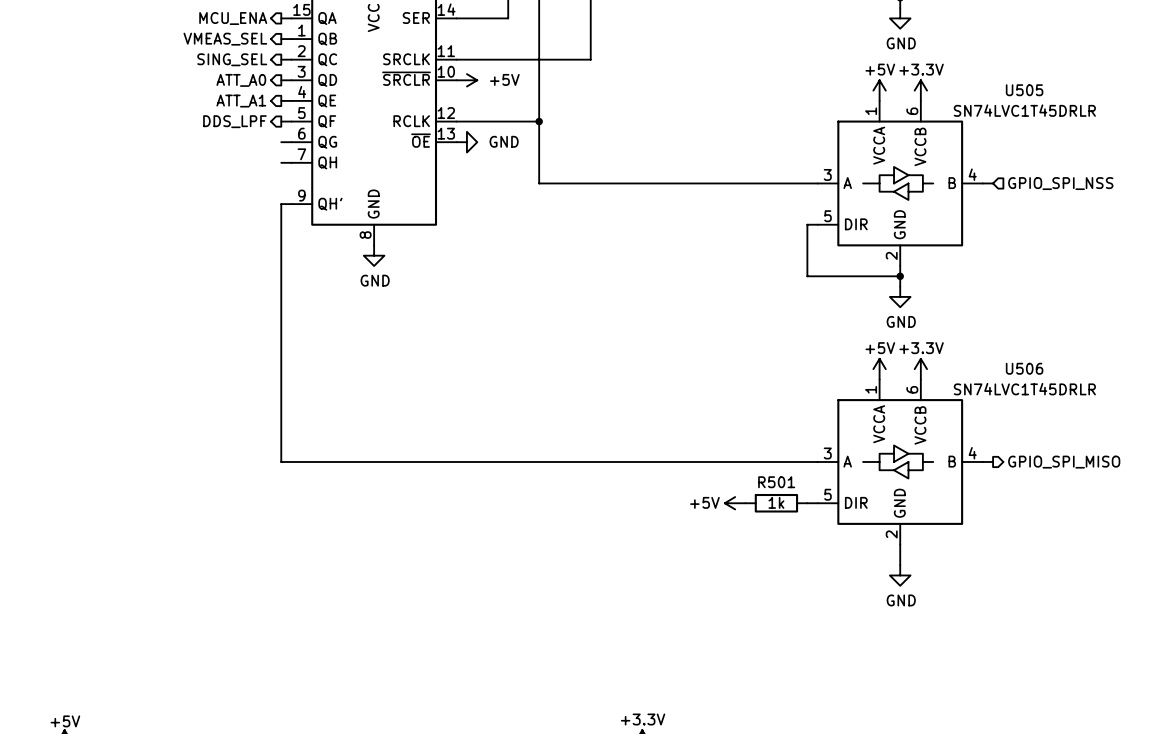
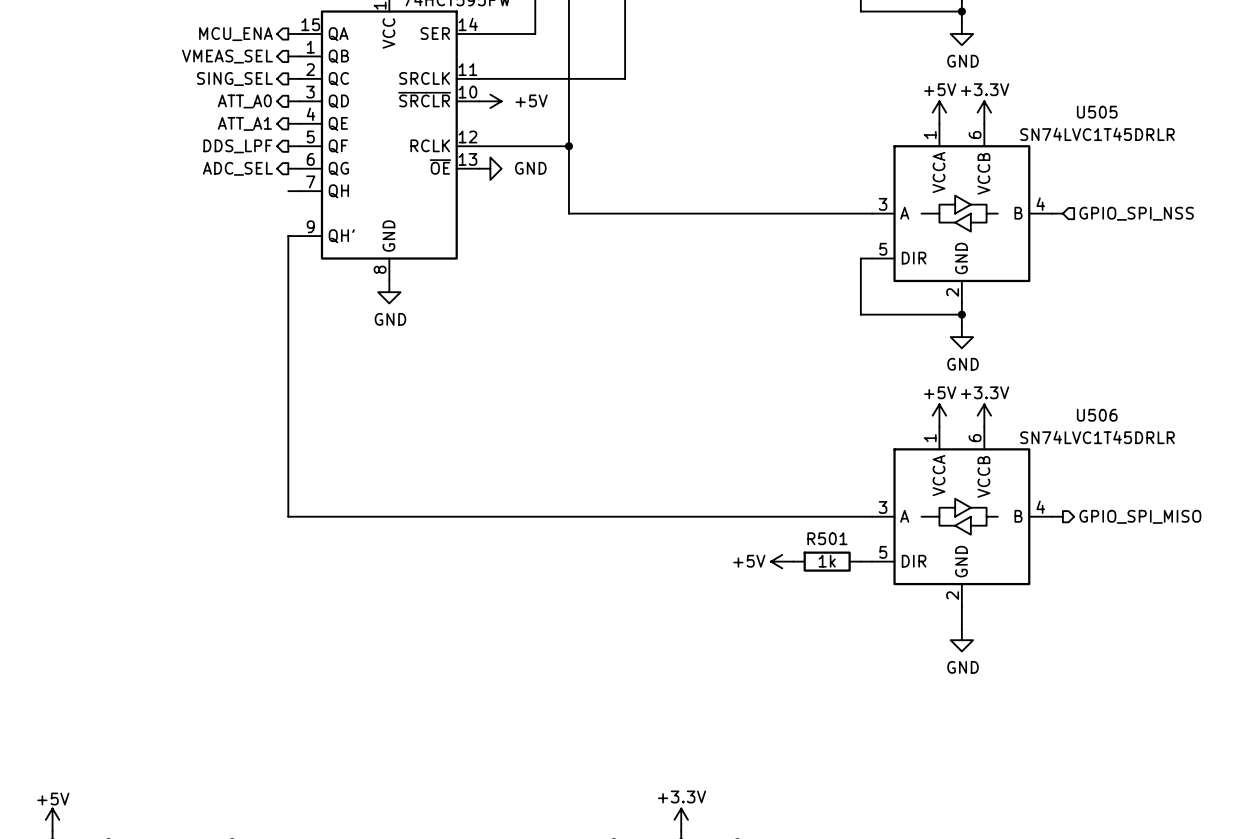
hierarchical label: none -> ADC_SEL (237, 168)

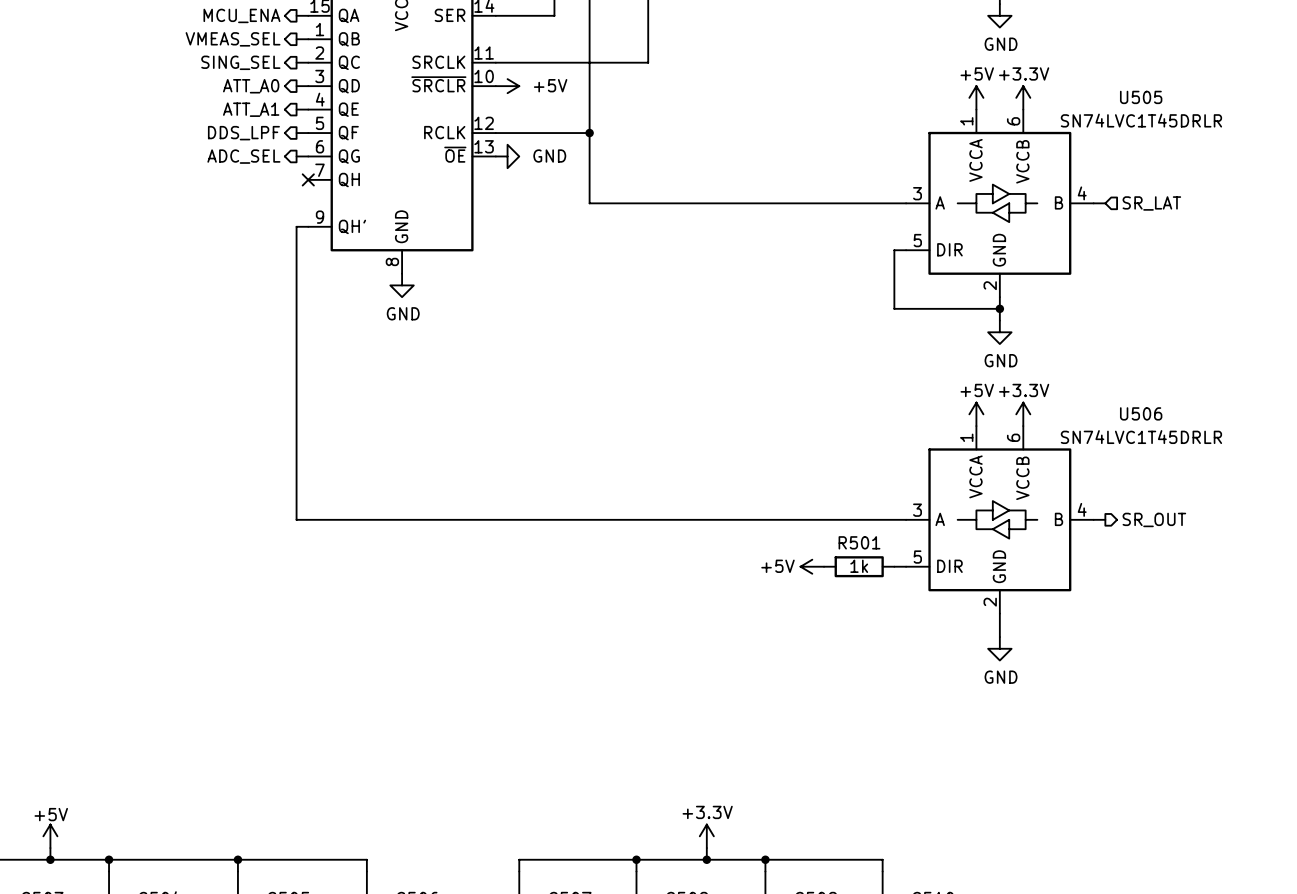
wire: (288, 191) (299, 191) -> none
no-connect mark: none -> (308, 179)
hierarchical label: GPIO_SPI_NSS (1136, 213) -> SR_LAT (1151, 203)
hierarchical label: GPIO_SPI_MISO (1140, 516) -> SR_OUT (1154, 519)

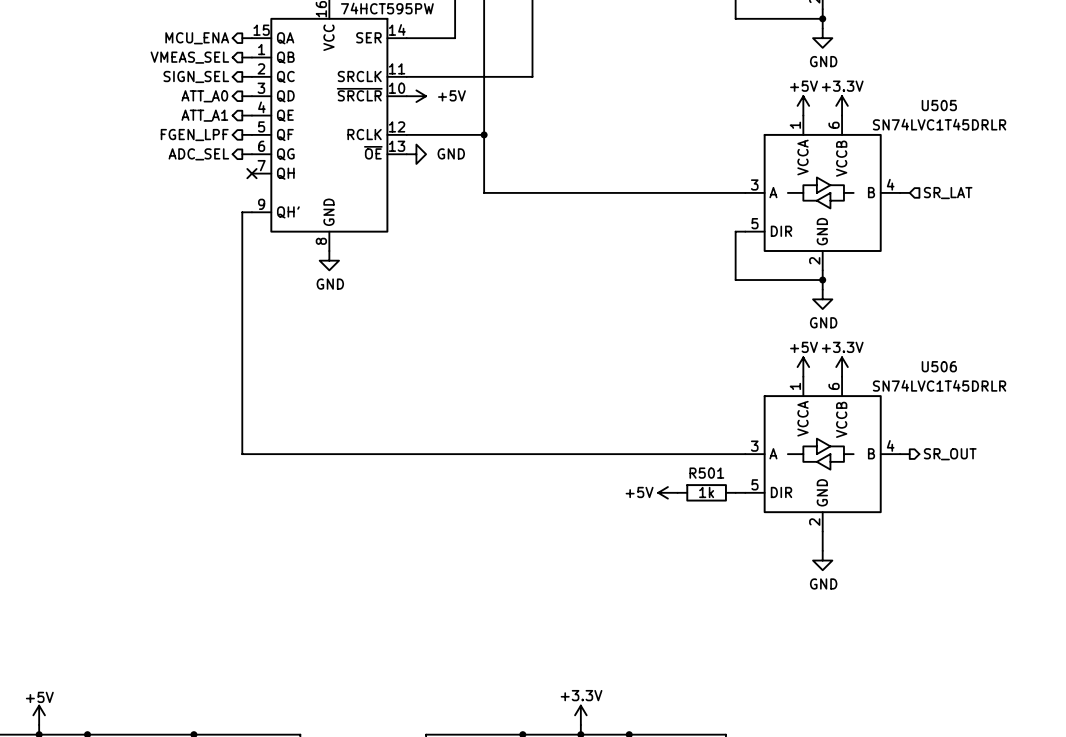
hierarchical label: SING_SEL (240, 62) -> SIGN_SEL (196, 76)
hierarchical label: DDS_LPF (243, 133) -> FGEN_LPF (194, 135)

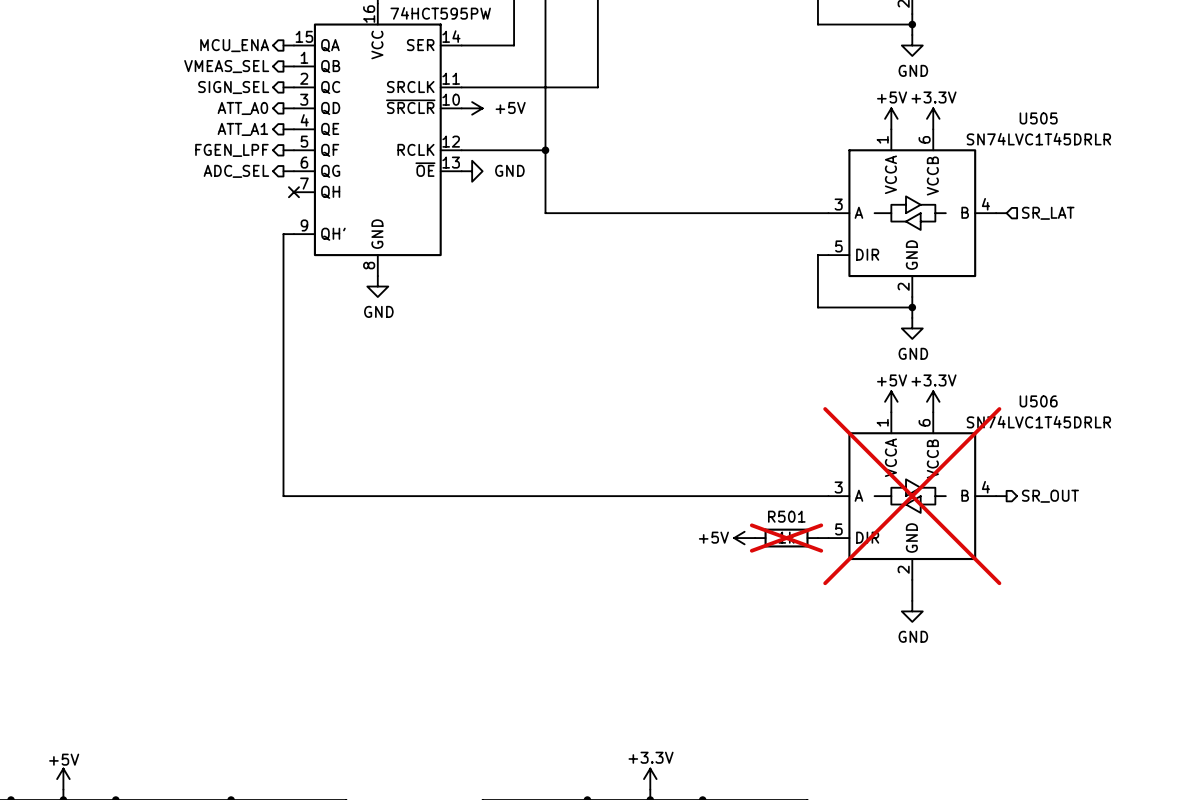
U506 do-not-place cross: none -> (912, 496)
R501 do-not-place cross: none -> (786, 538)

